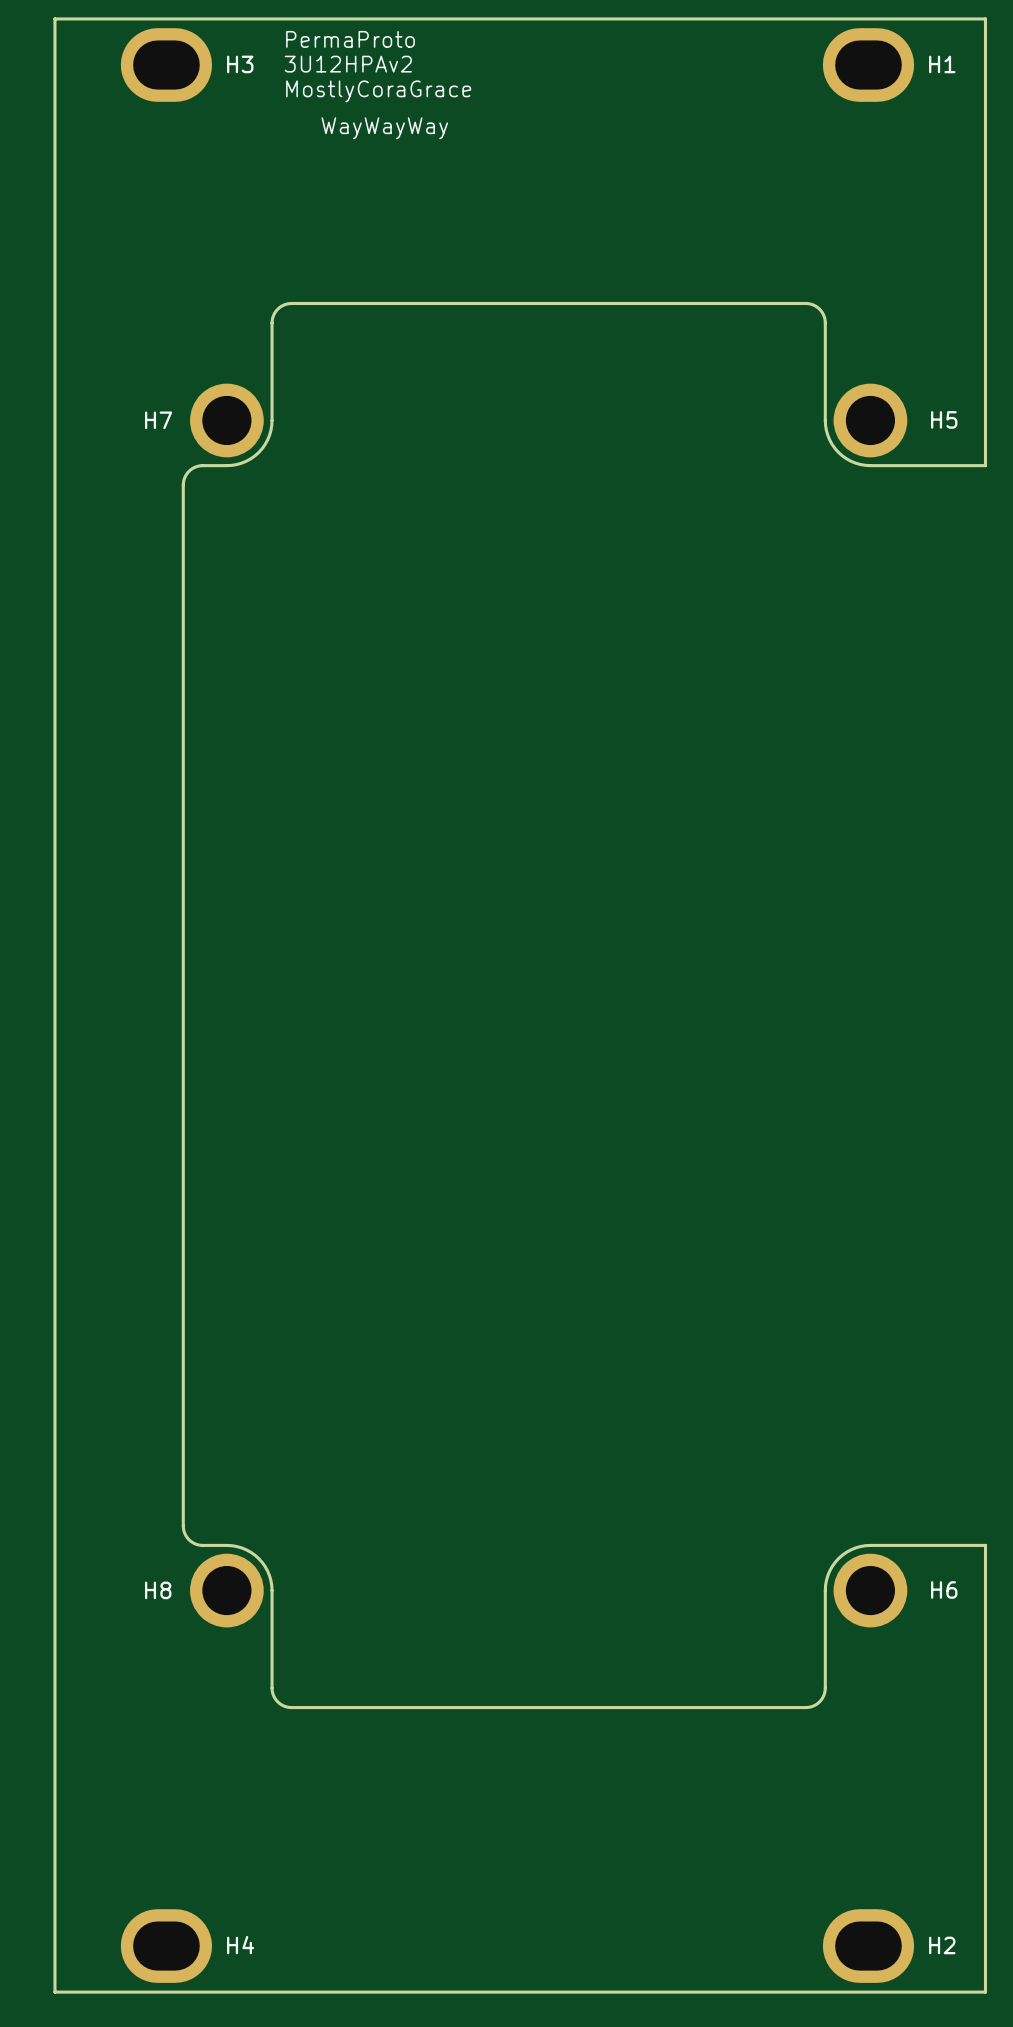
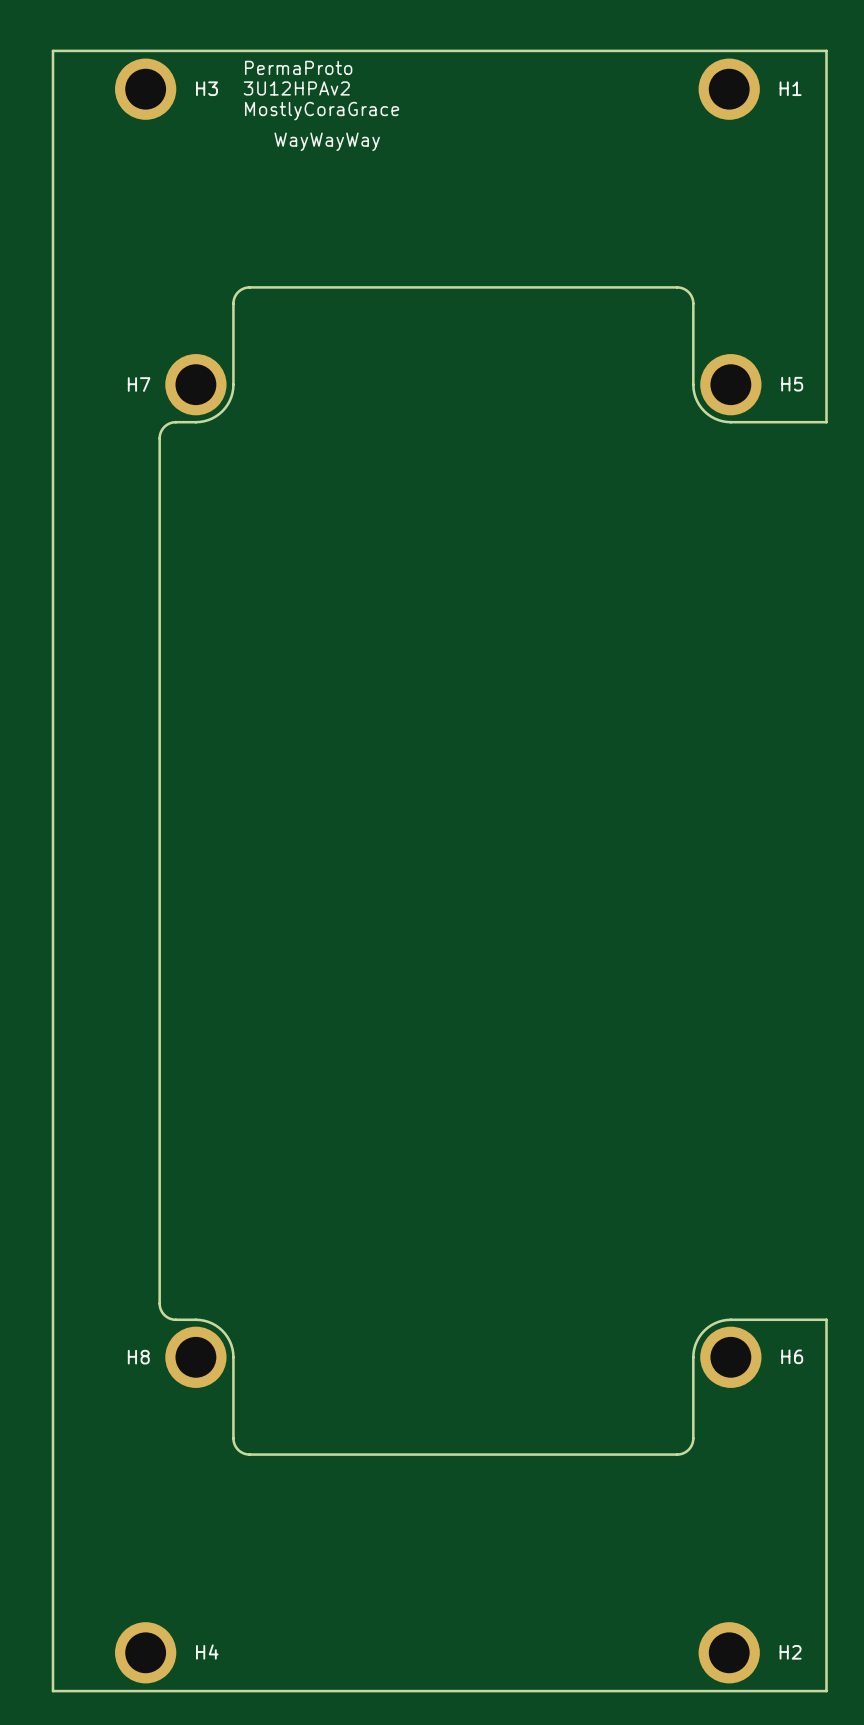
H3 footprint: [120, 28, 213, 102] -> [115, 58, 177, 120]
H1 footprint: [822, 28, 915, 102] -> [698, 58, 760, 120]
H4 footprint: [120, 1909, 213, 1983] -> [115, 1622, 177, 1684]
H2 footprint: [822, 1909, 915, 1983] -> [698, 1622, 760, 1684]

